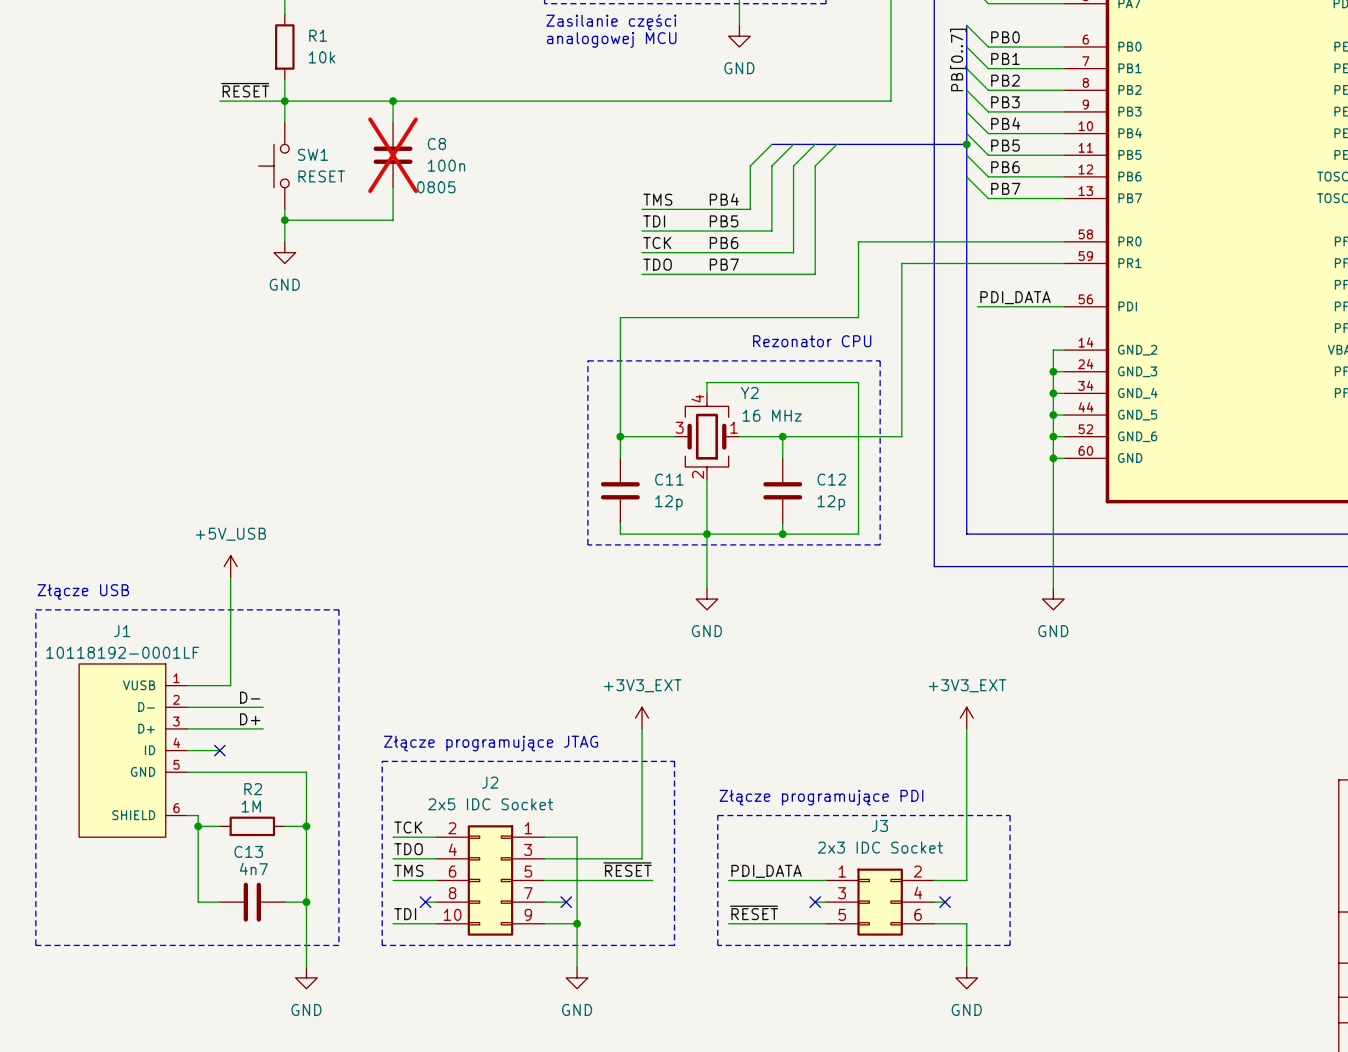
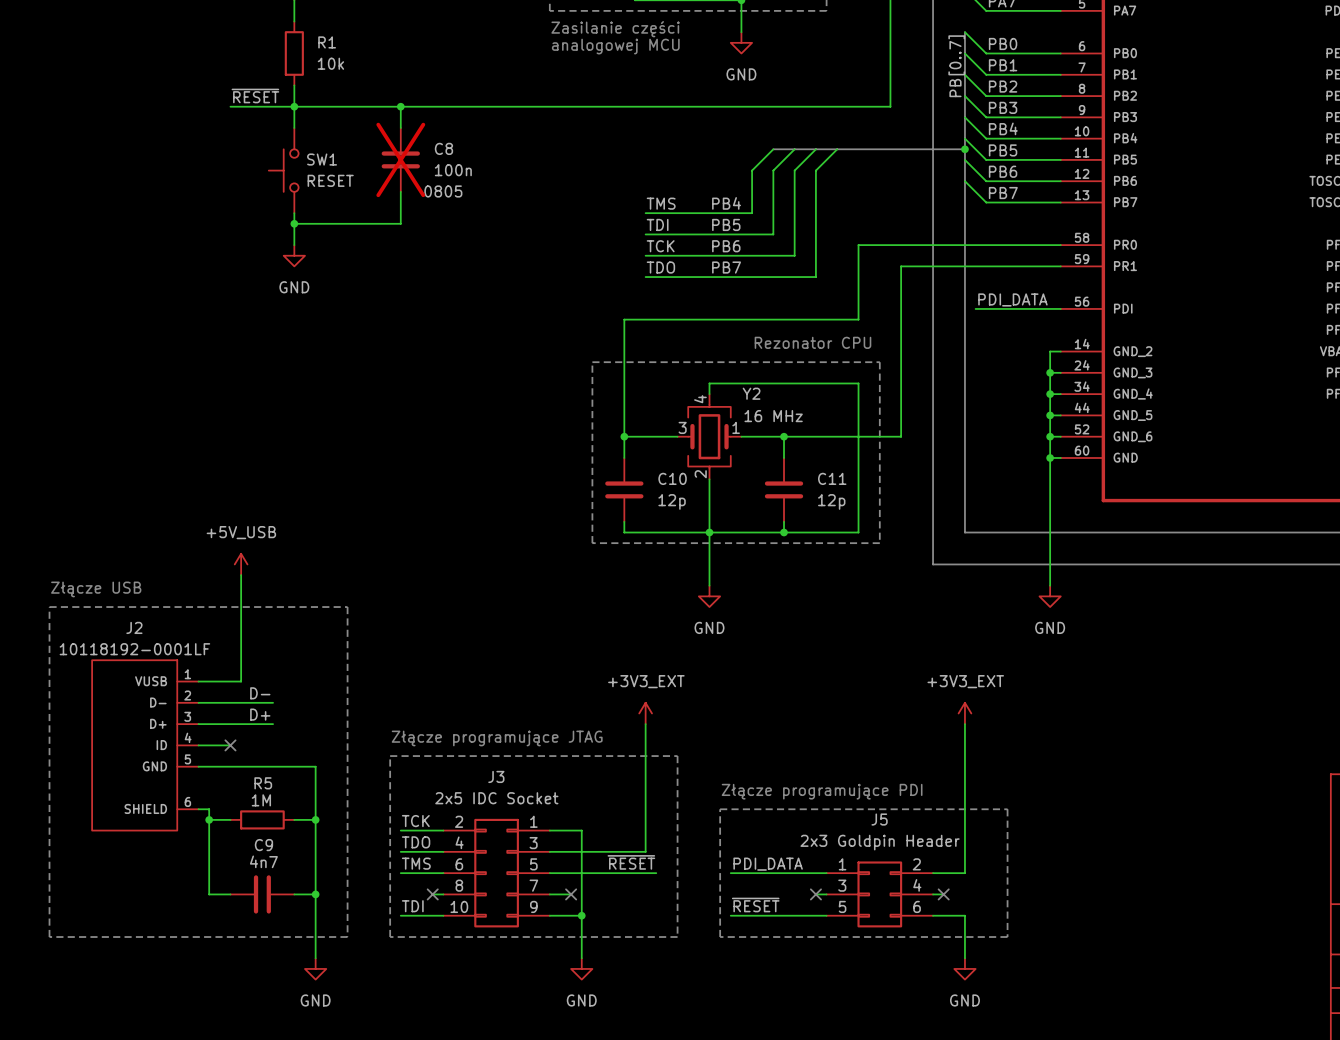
C11 name: C11 (669, 479) -> C10 (672, 478)
C12 name: C12 (831, 479) -> C11 (832, 478)
J1 name: J1 (122, 631) -> J2 (134, 627)
J2 name: J2 (490, 782) -> J3 (496, 776)
R2 name: R2 (253, 789) -> R5 (263, 783)
J3 name: J3 (879, 825) -> J5 (879, 819)
J3 value: 2x3 IDC Socket (880, 847) -> 2x3 Goldpin Header (880, 842)
C13 name: C13 (248, 851) -> C9 (263, 845)

